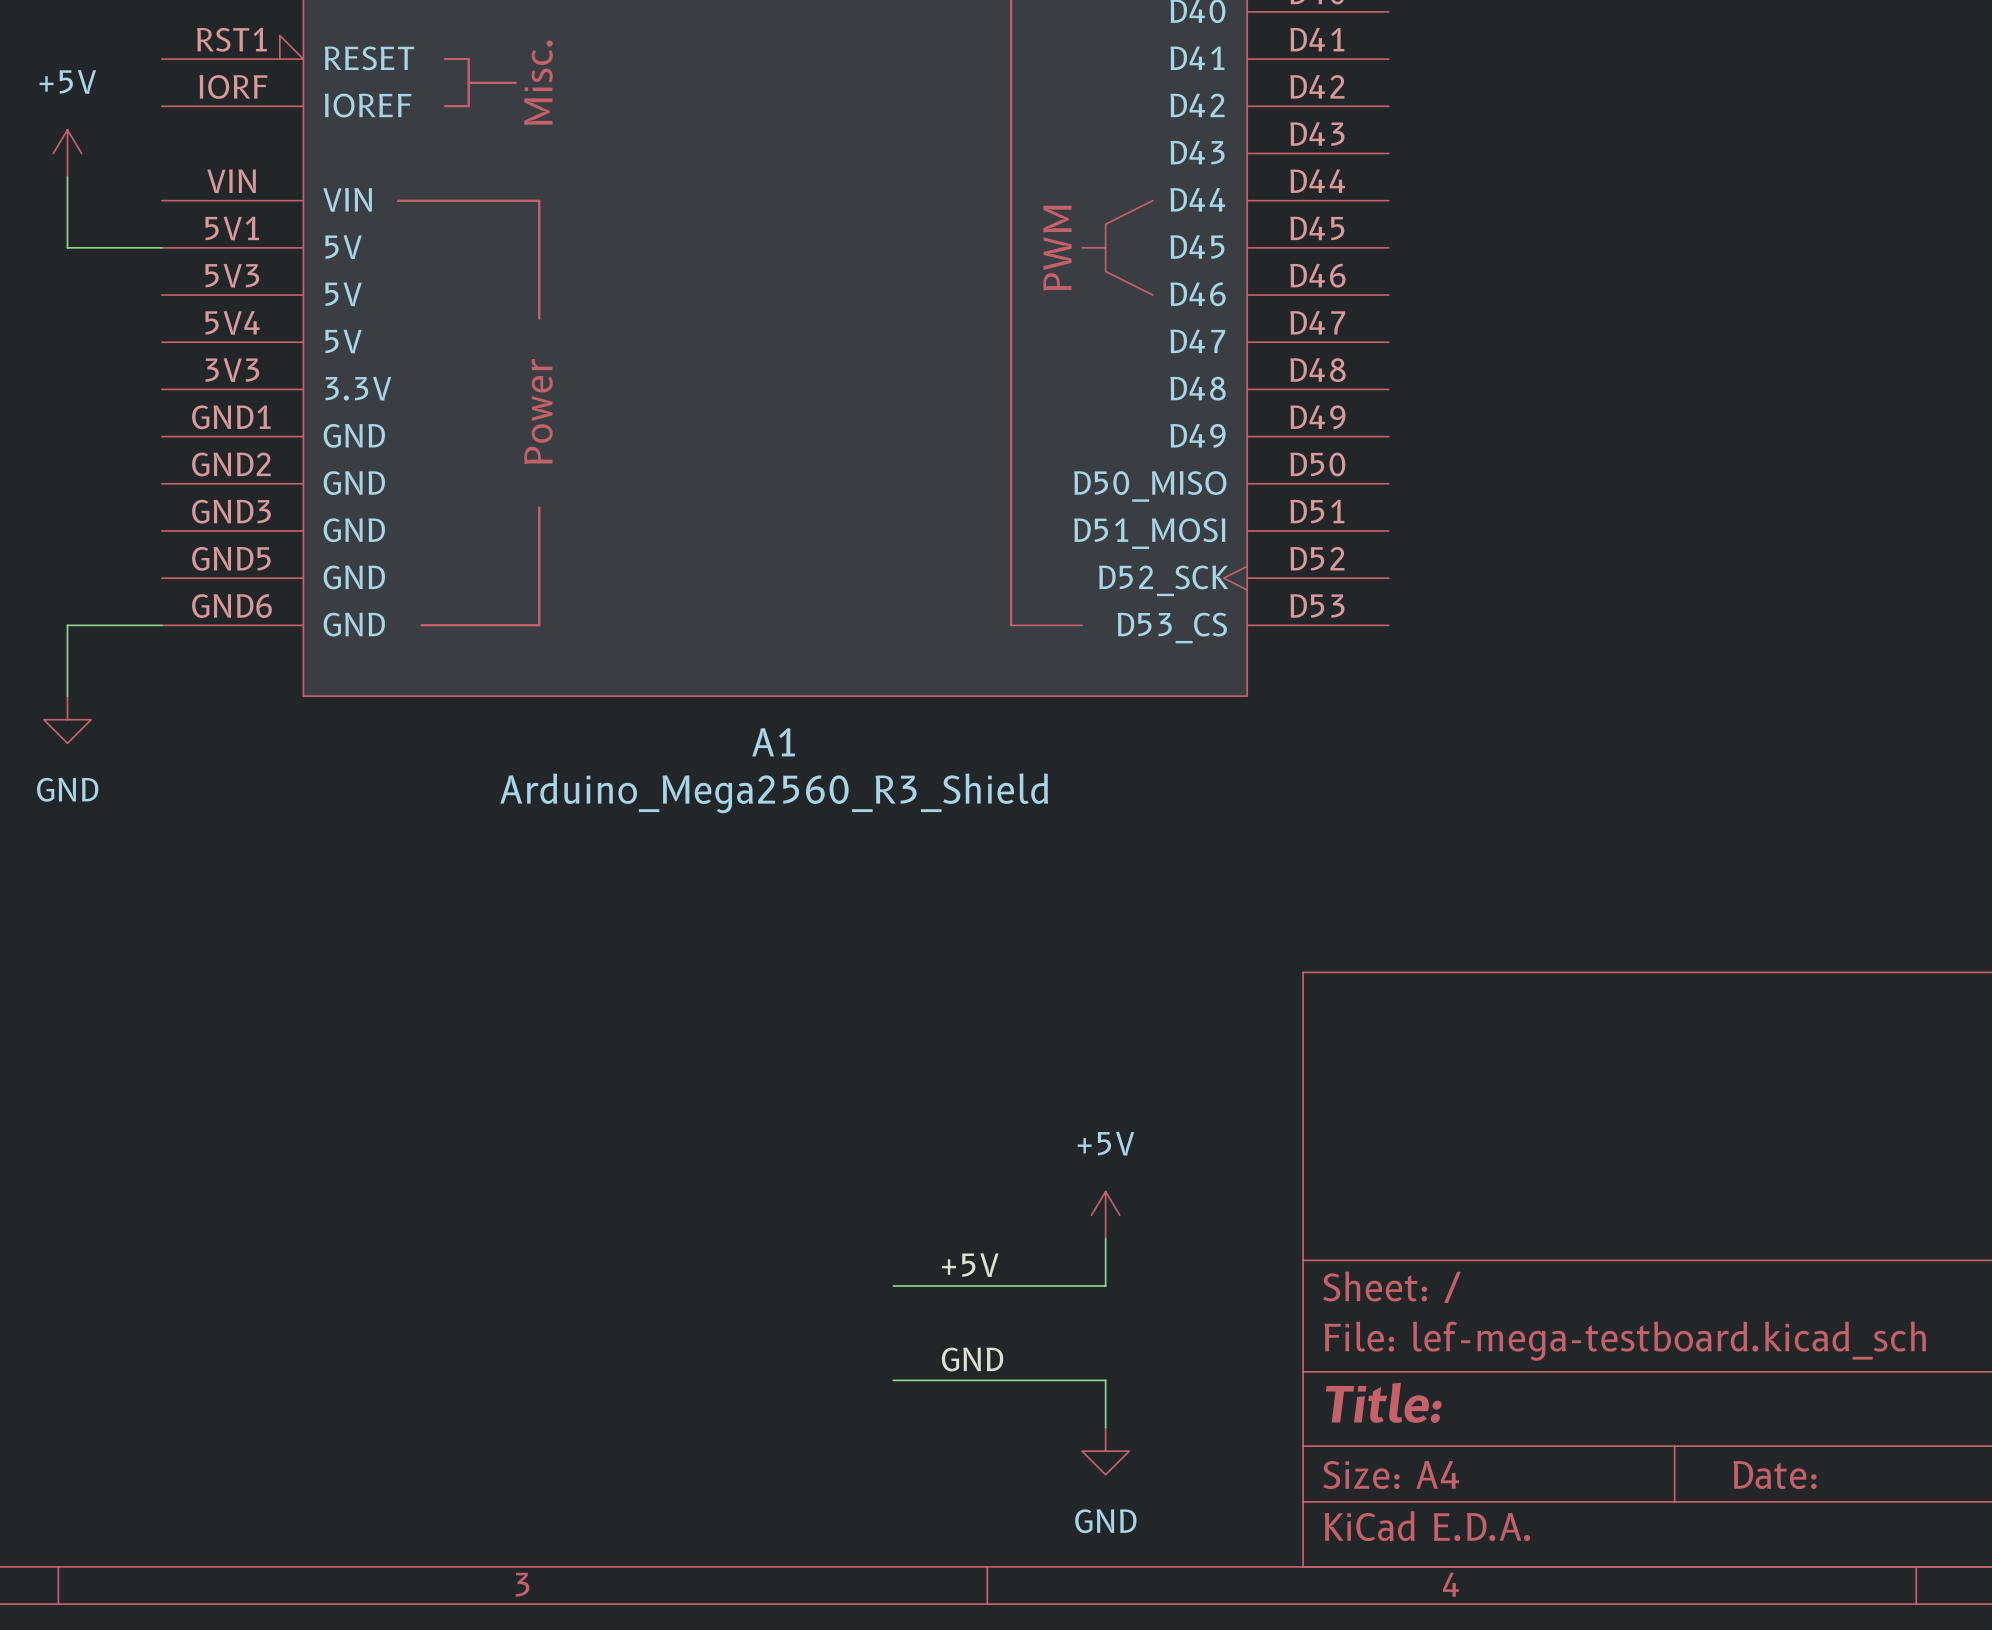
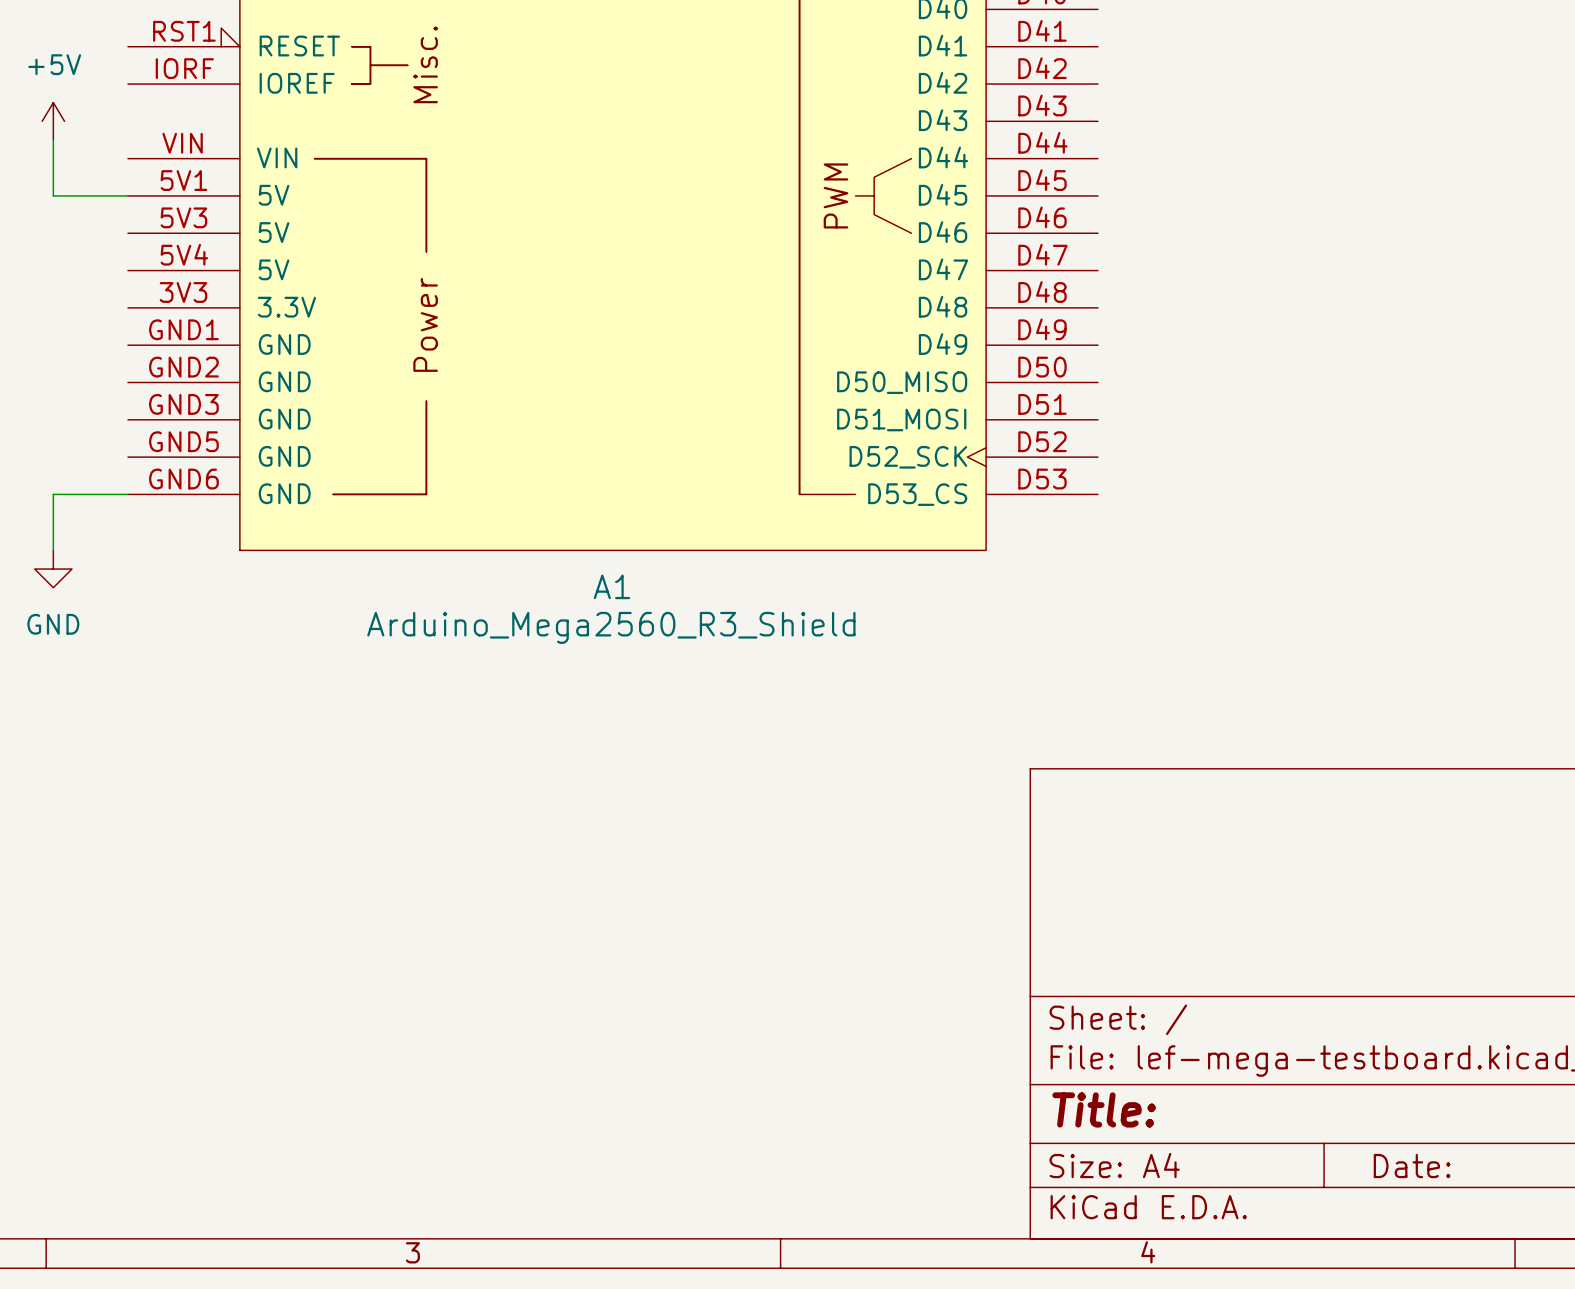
power symbol: +5V (1105, 1215) -> none
wire: (1105, 1238) (1105, 1286) (893, 1286) -> none
label: +5V (970, 1265) -> none
label: GND (972, 1359) -> none
wire: (893, 1380) (1105, 1380) (1105, 1427) -> none
power symbol: GND (1105, 1451) -> none

